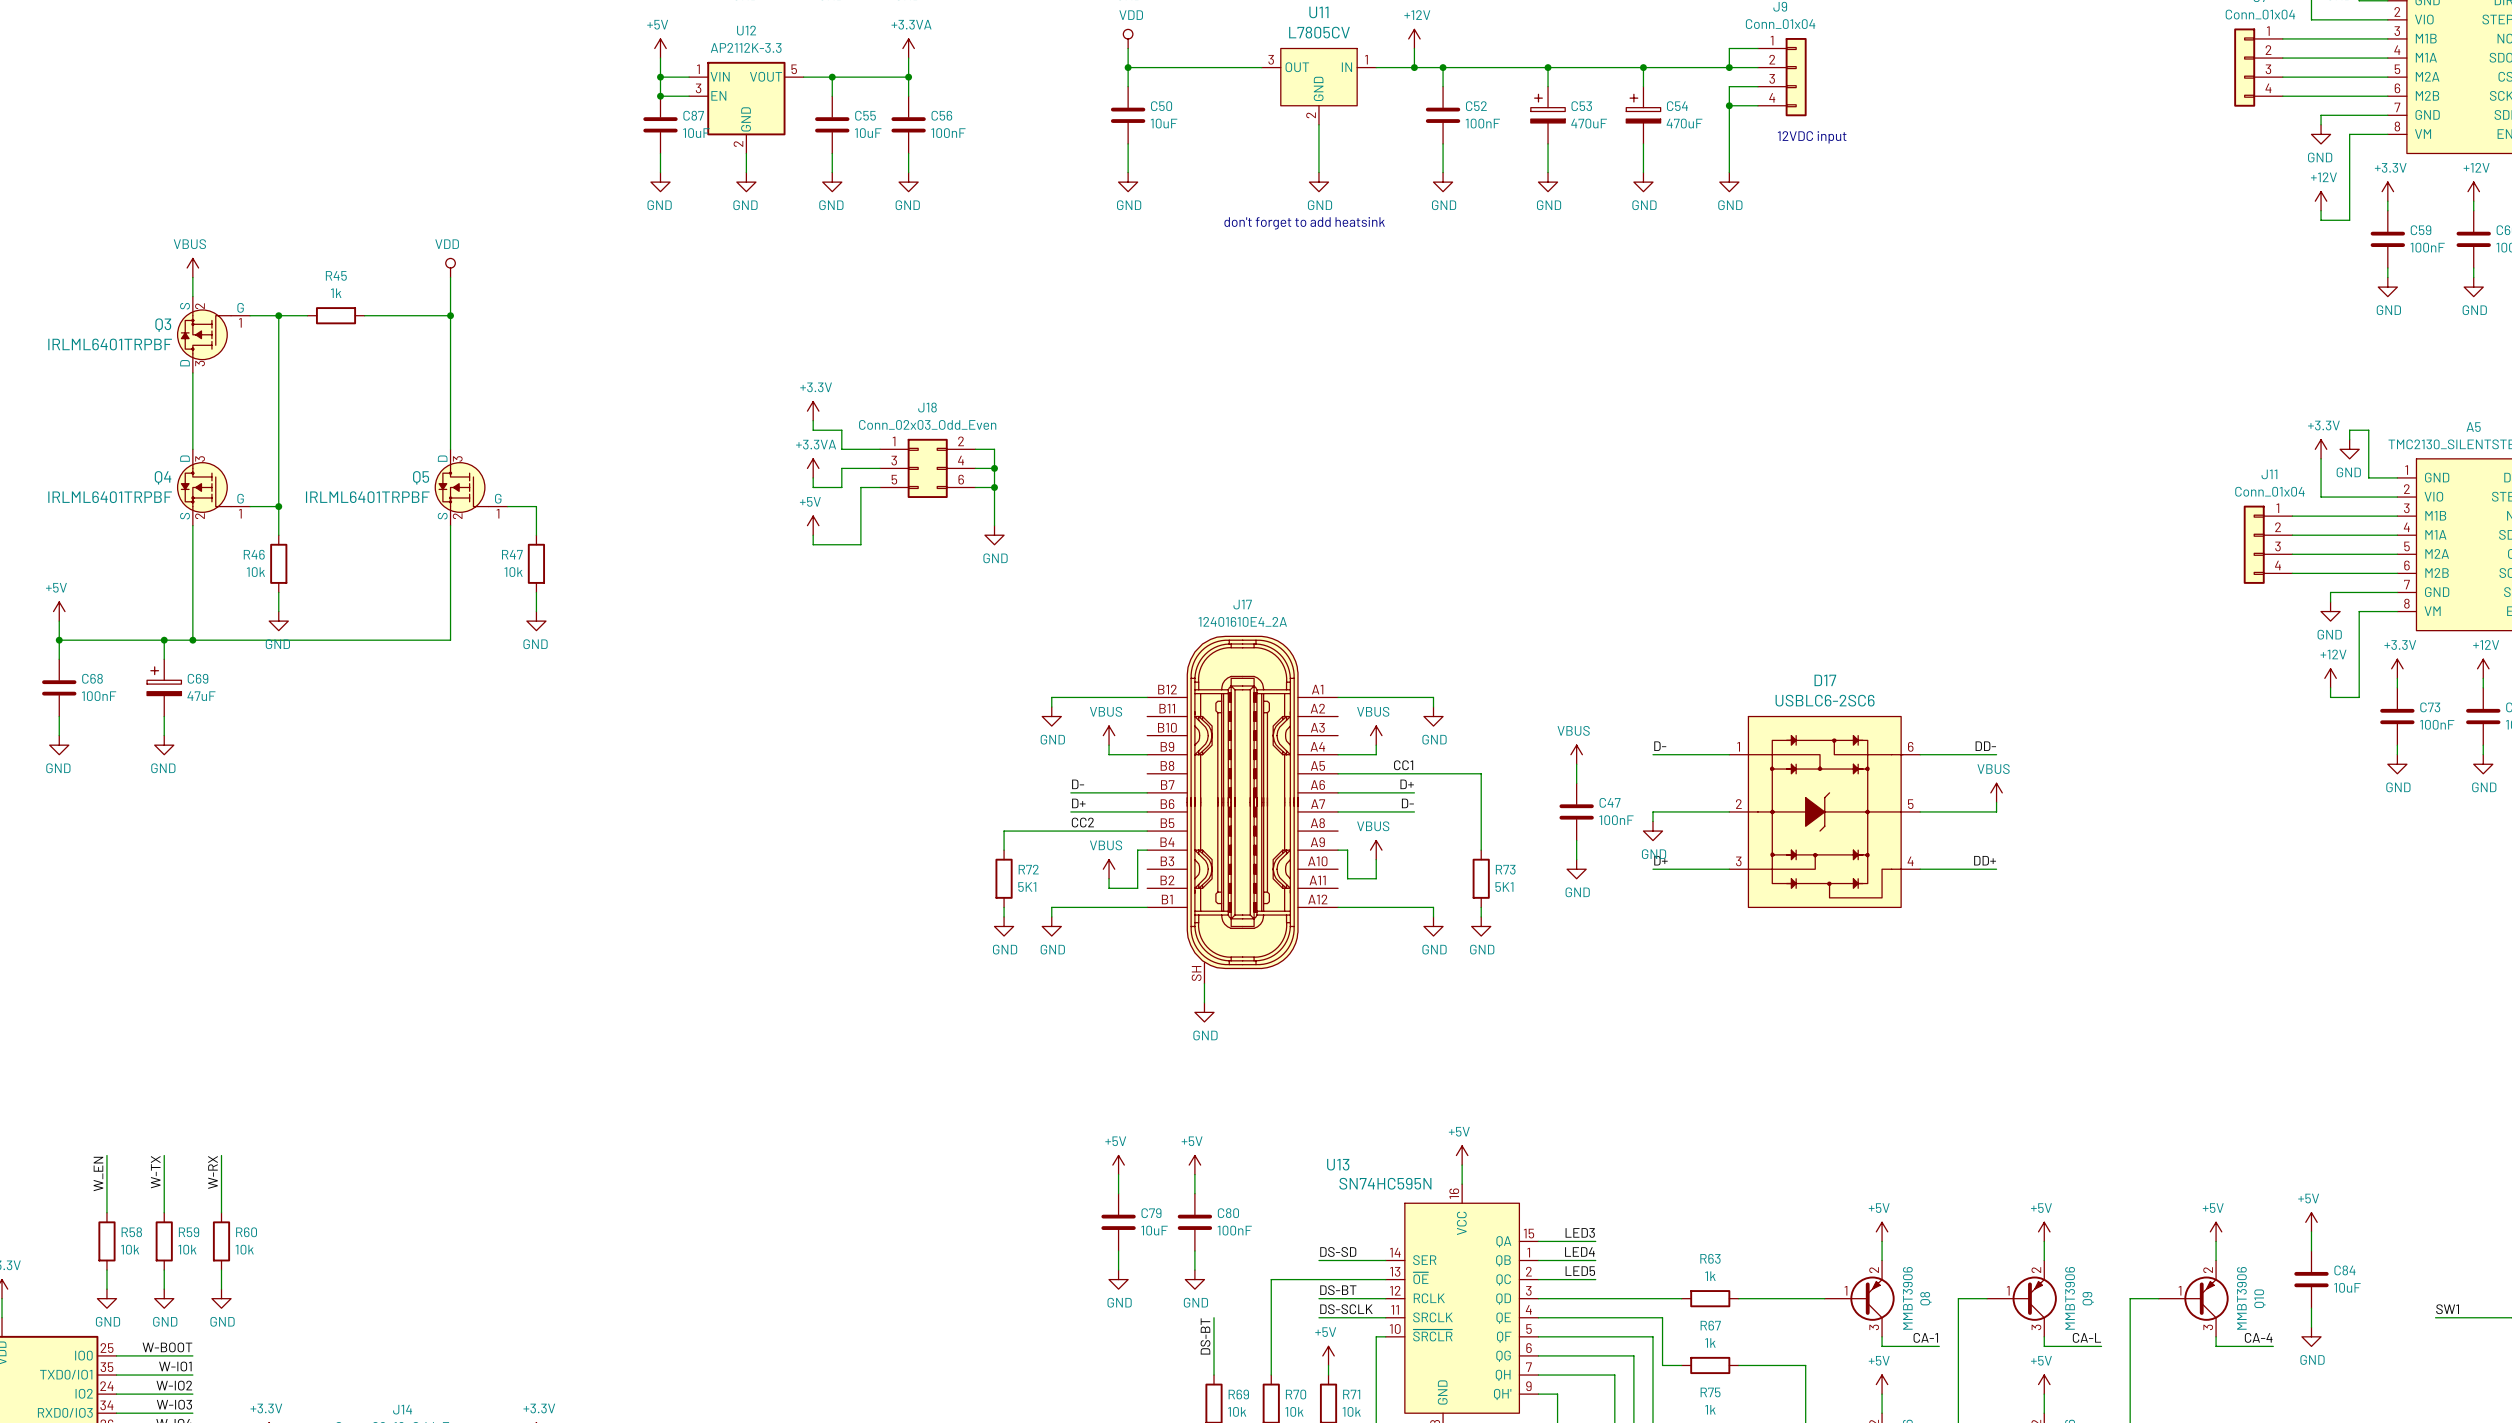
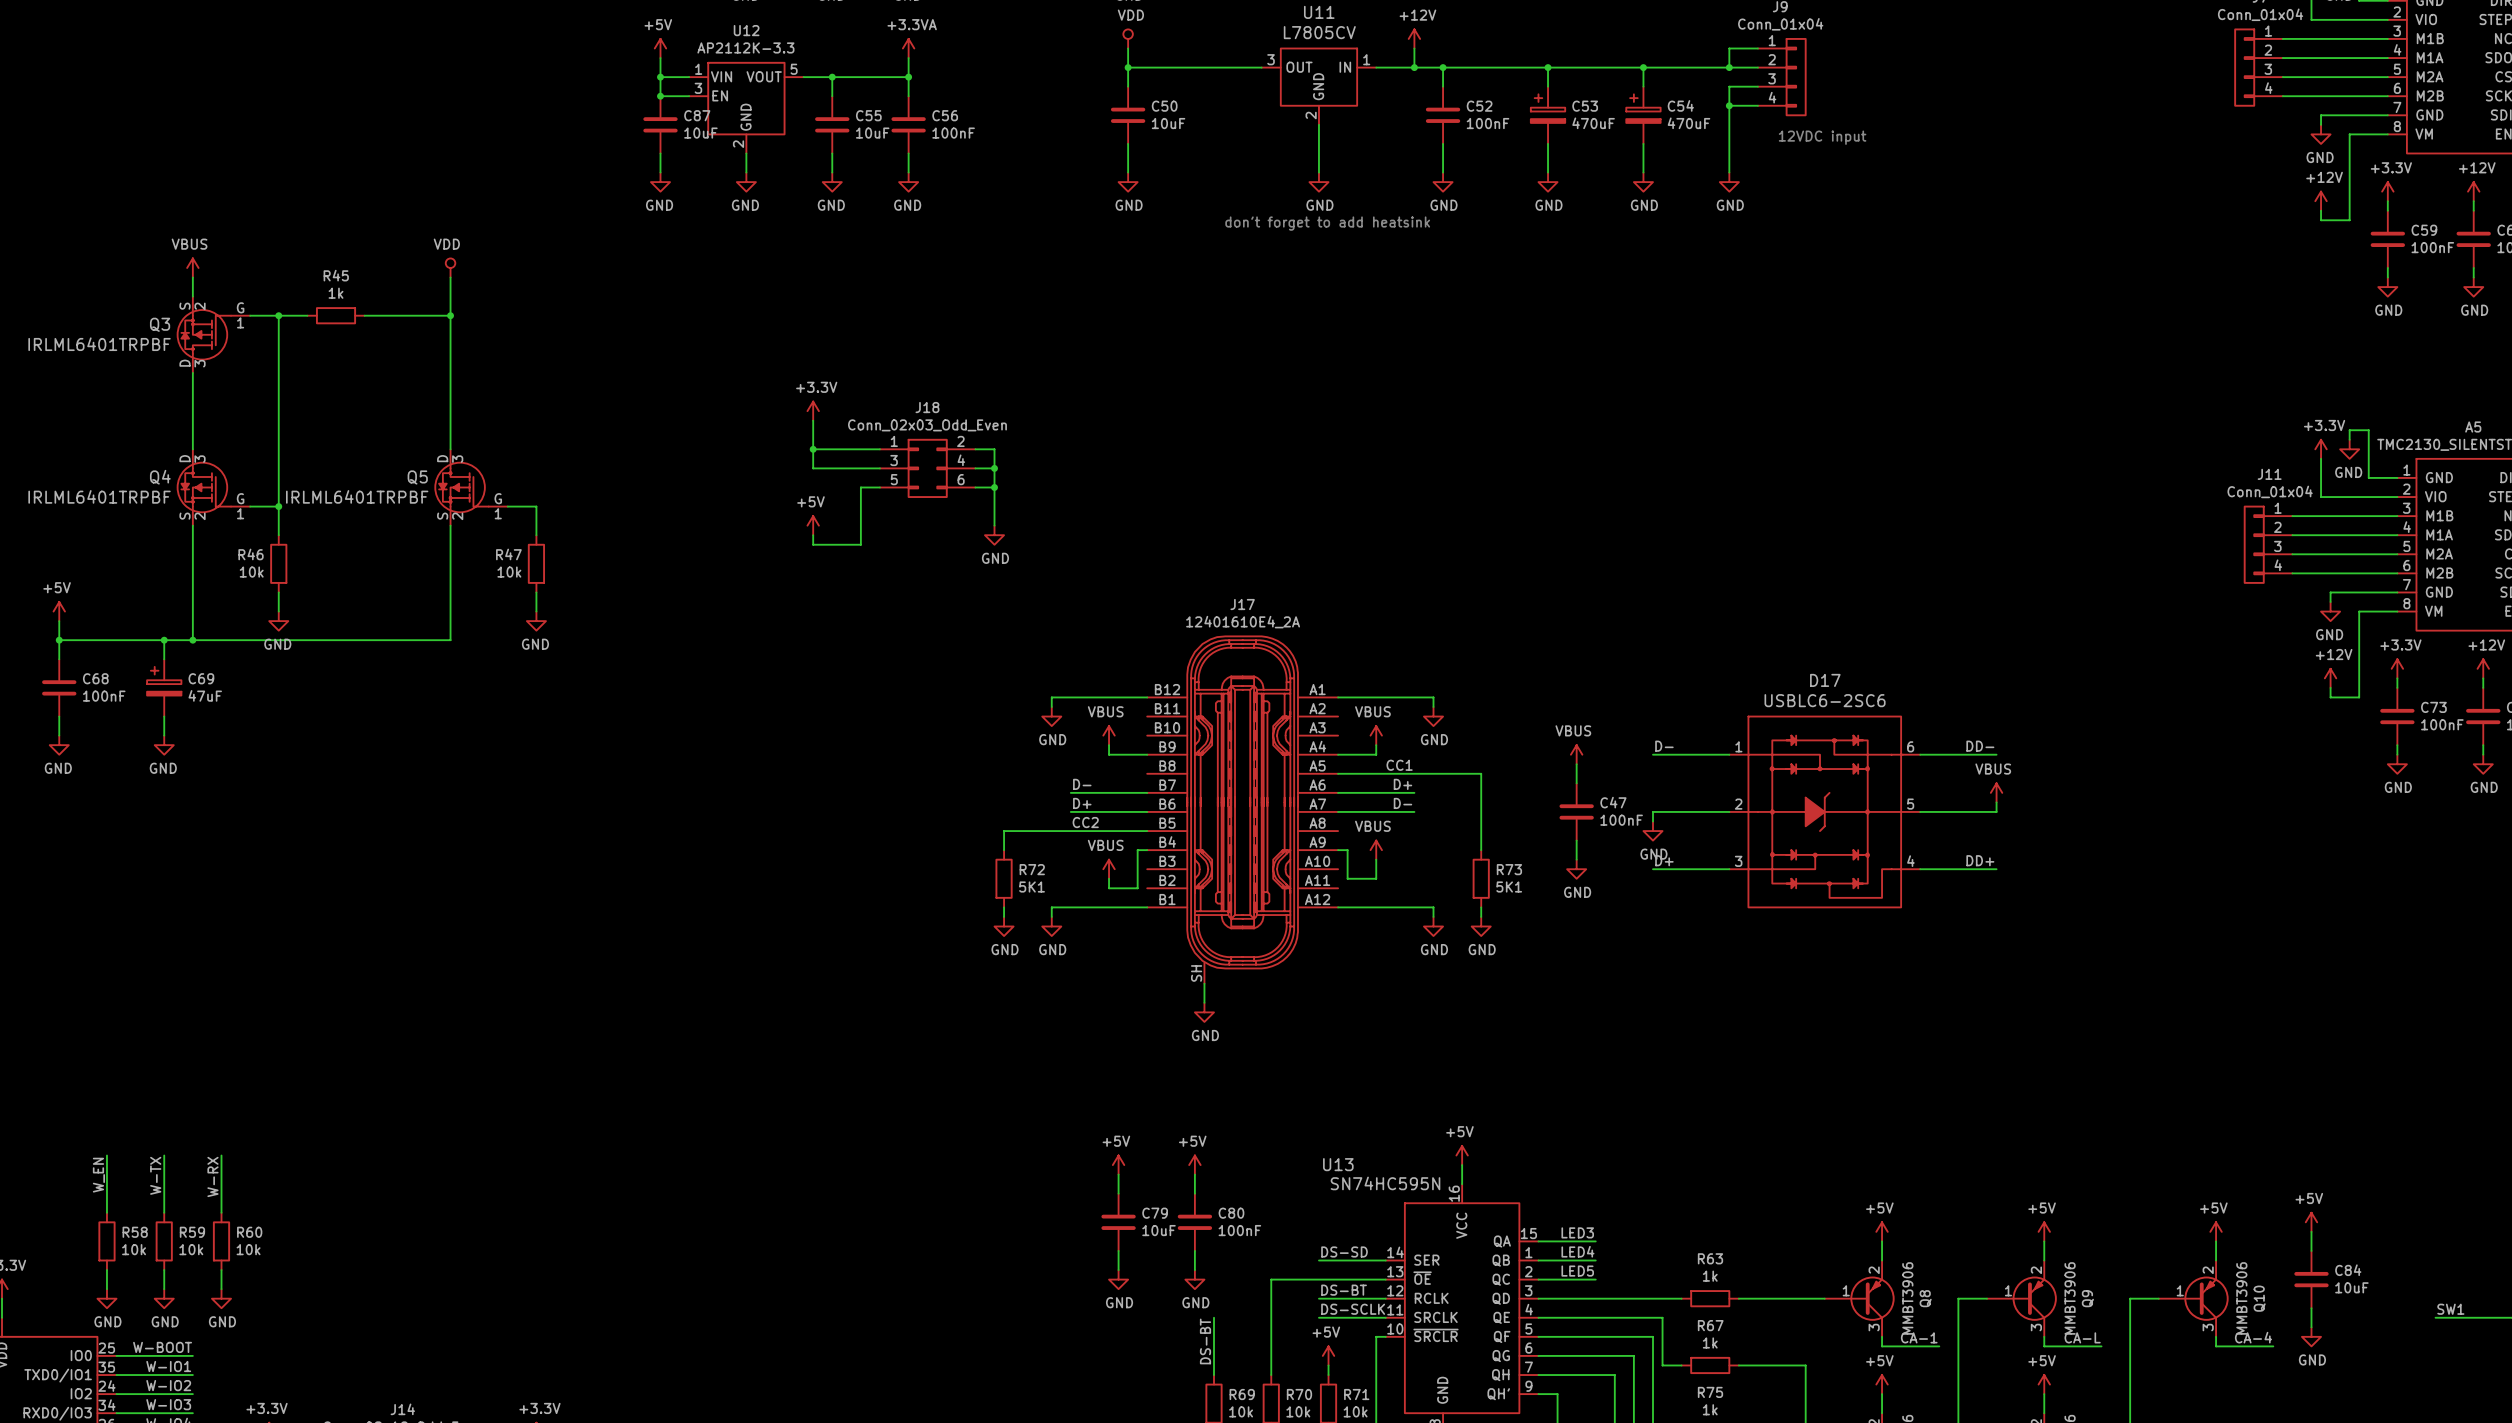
wire: (813, 430) (841, 430) (841, 449) -> (813, 430) (813, 468) (841, 468)
wire: none -> (813, 449) (841, 449)
junction: none -> (813, 449)
power symbol: +3.3VA (813, 468) -> none
wire: (841, 468) (841, 487) (813, 487) (813, 477) -> none

